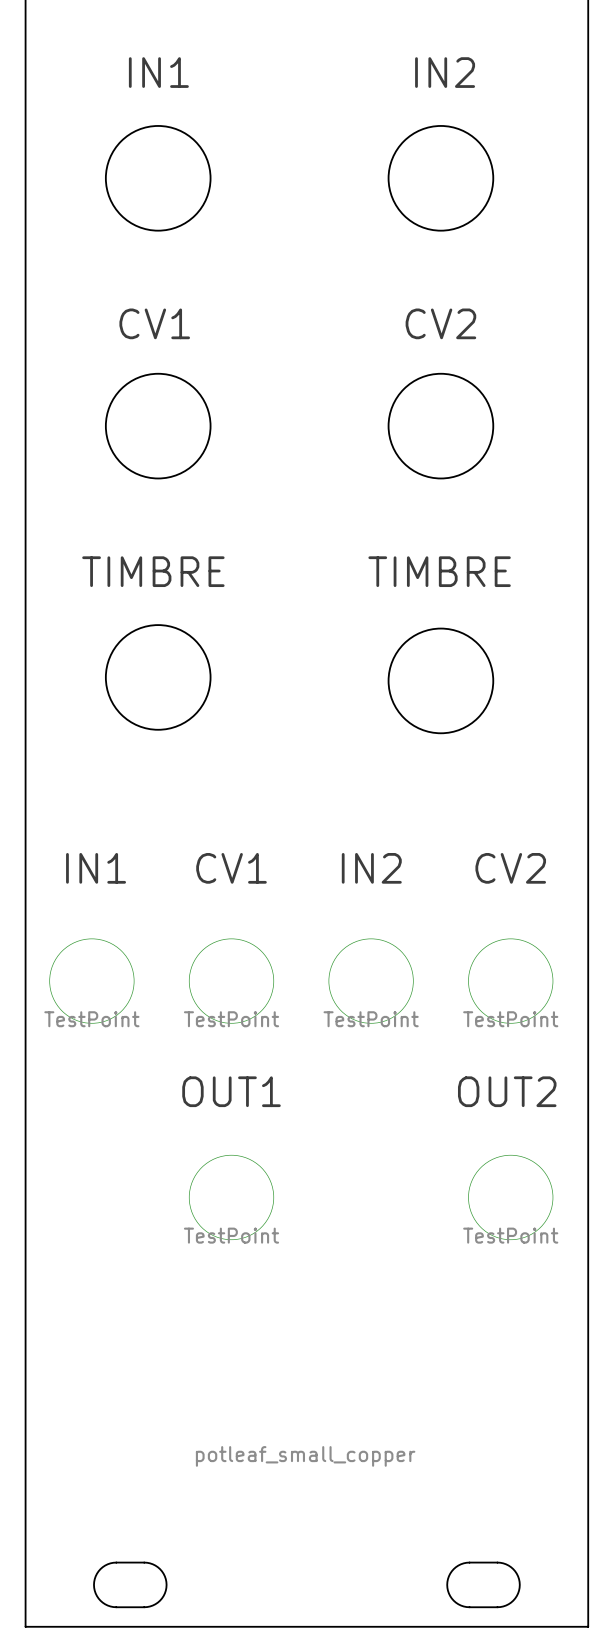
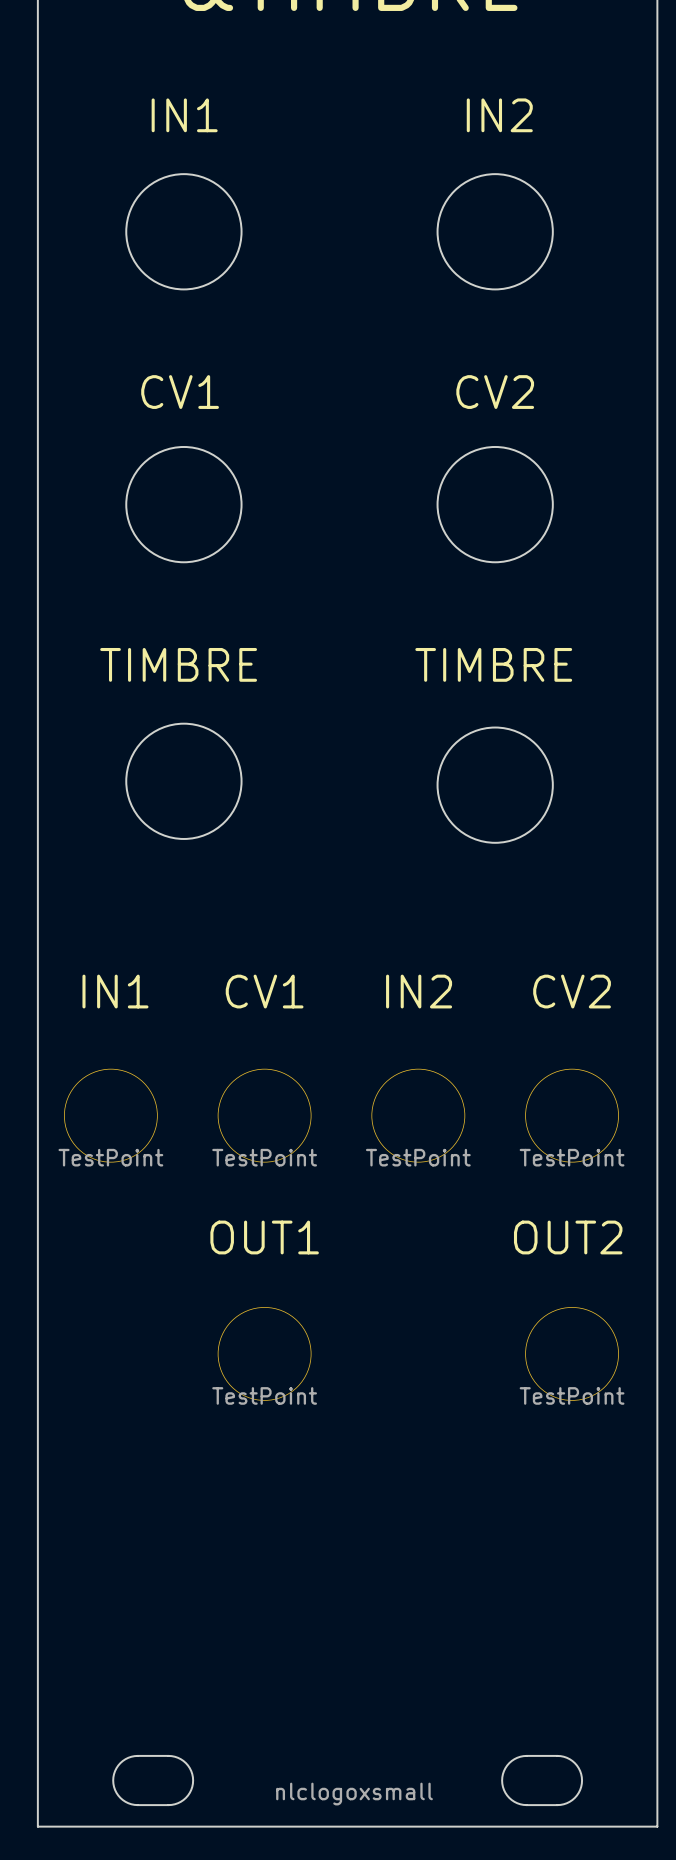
drawing: [195, 1446, 416, 1467] -> none
drawing: none -> [276, 1782, 433, 1806]

